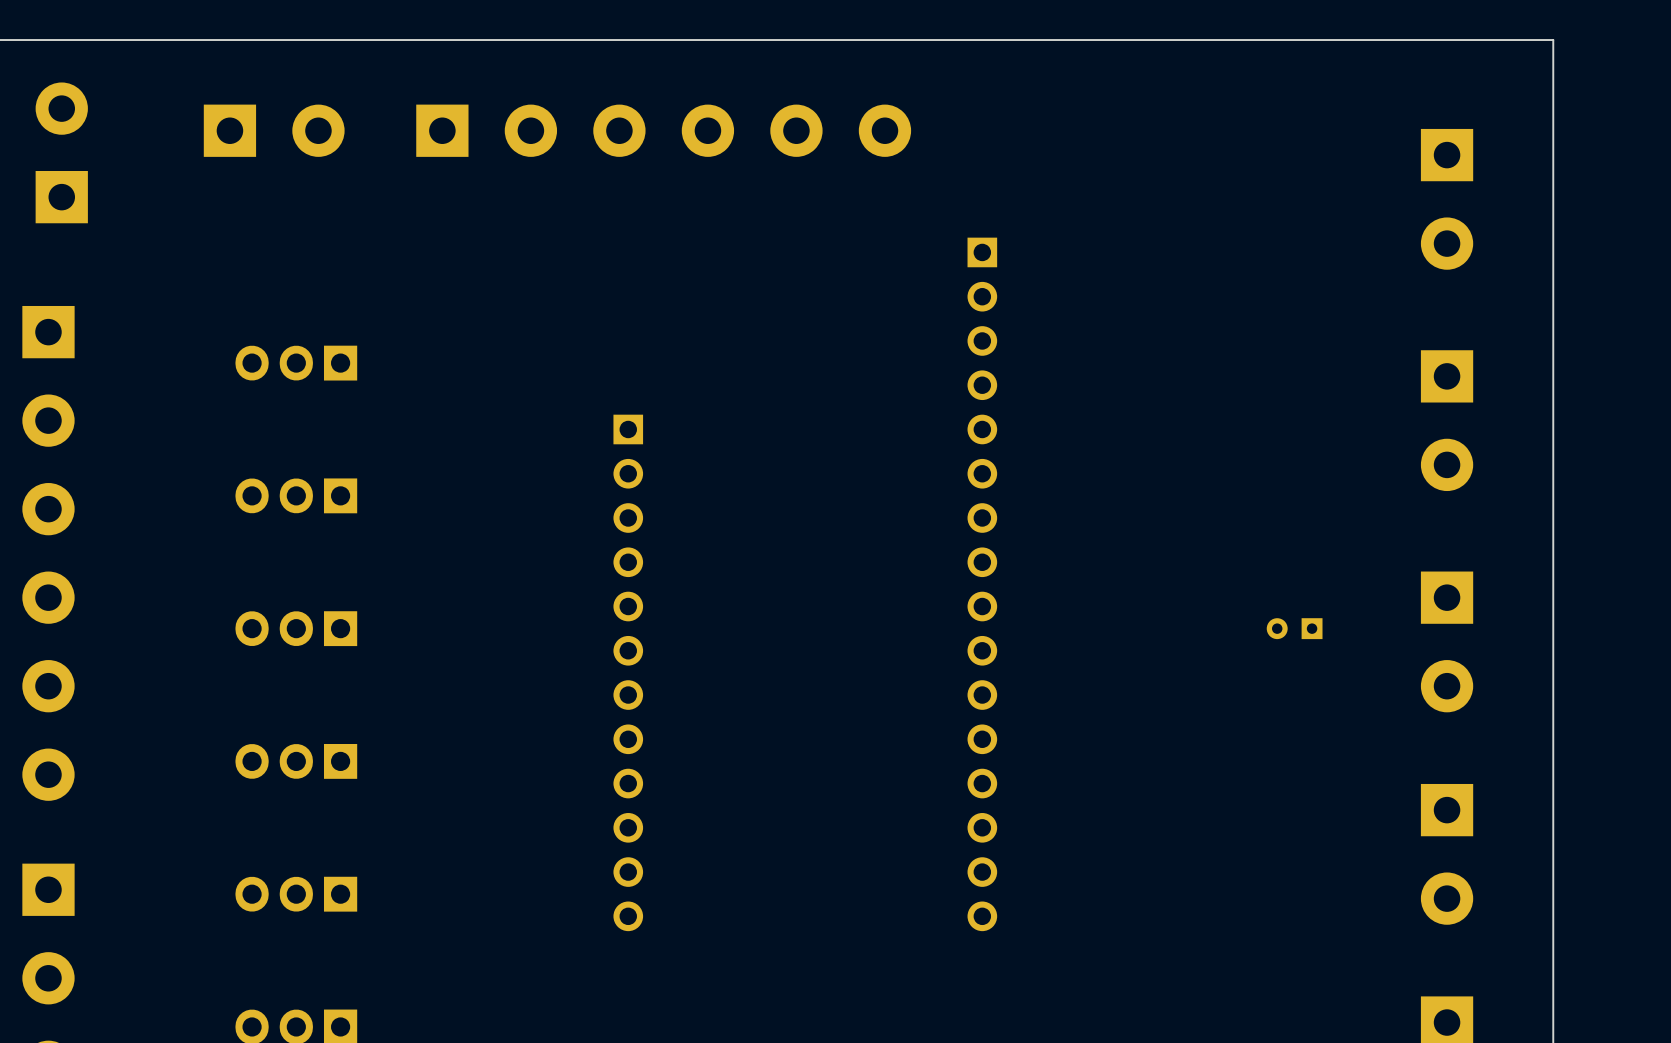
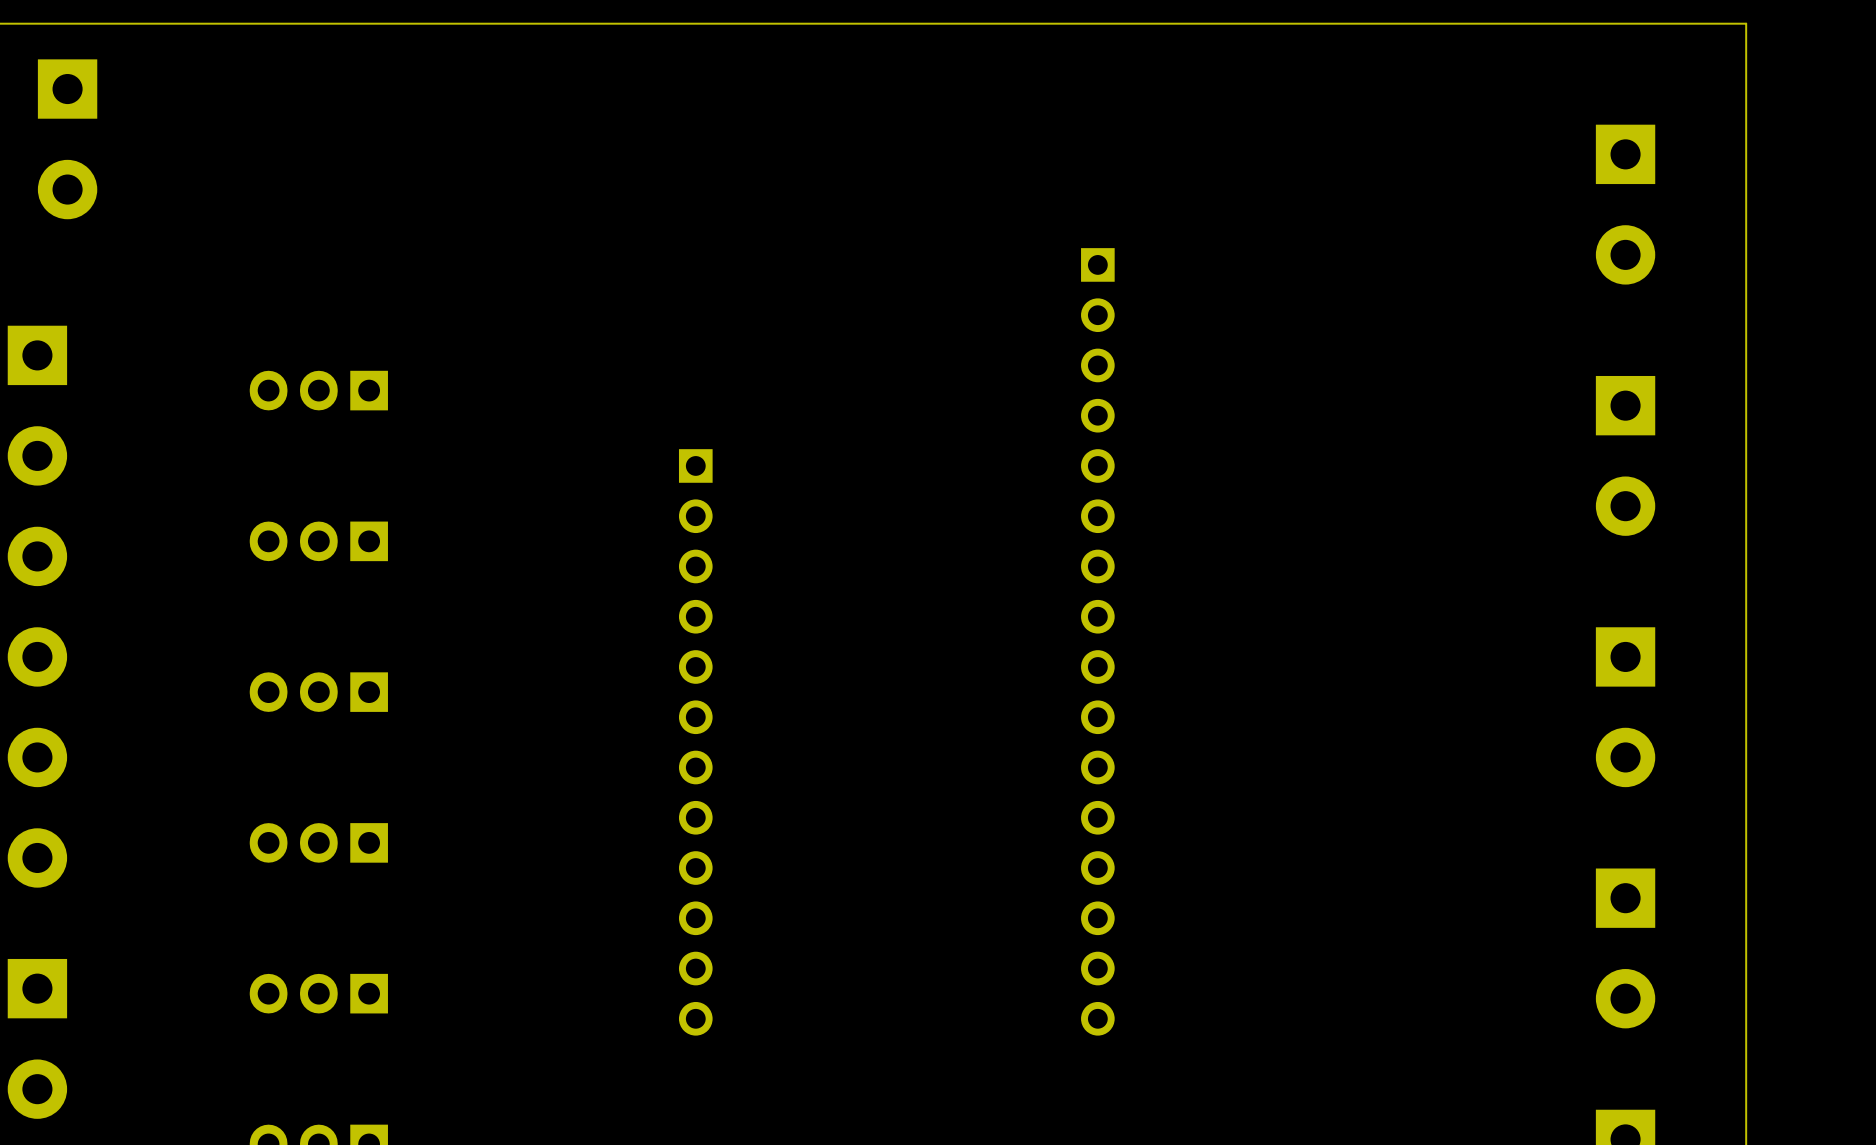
part: (274, 130) -> none
part: (663, 130) -> none
part rotation: 0° (61, 152) -> 180° (67, 139)
part: (1294, 628) -> none

